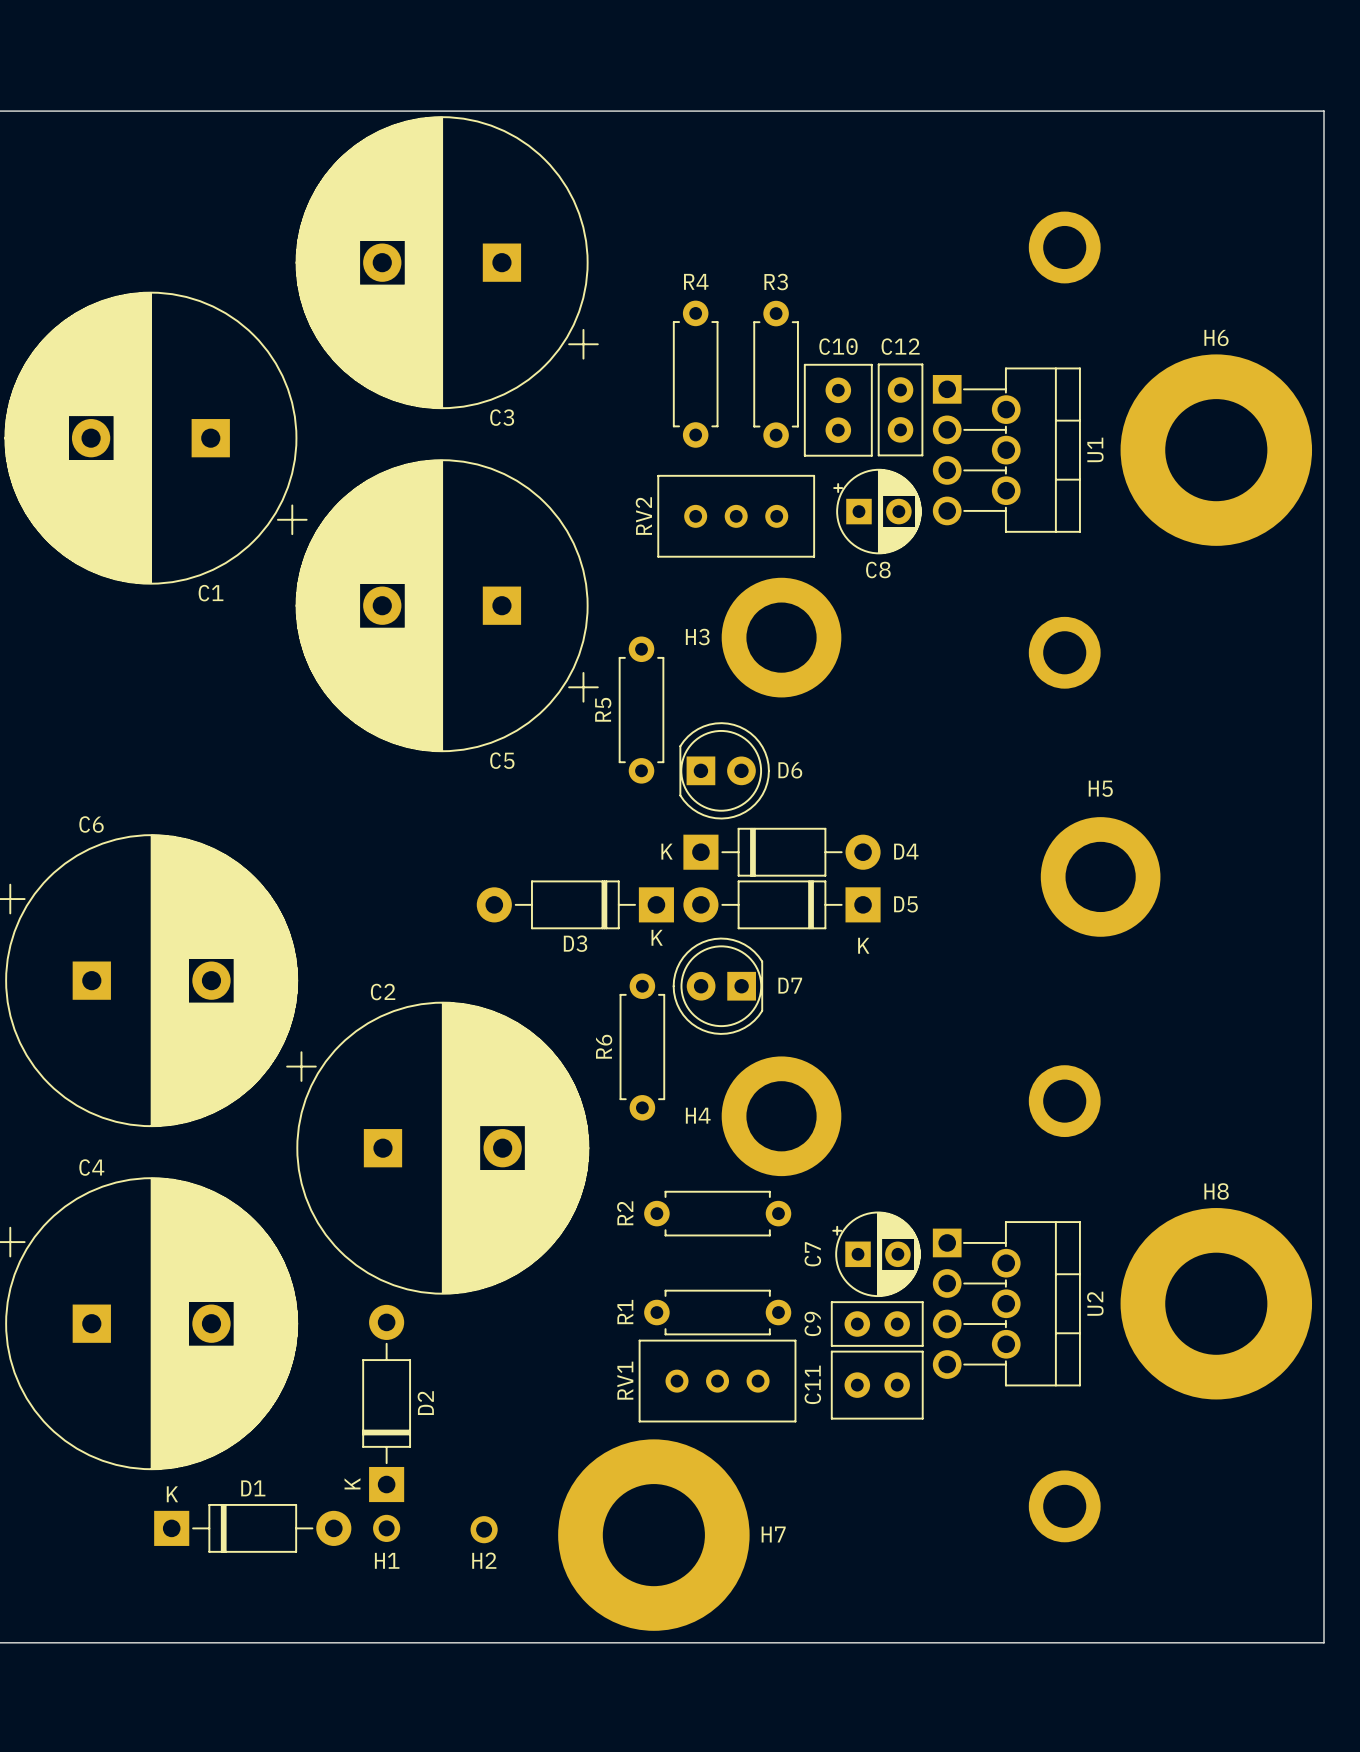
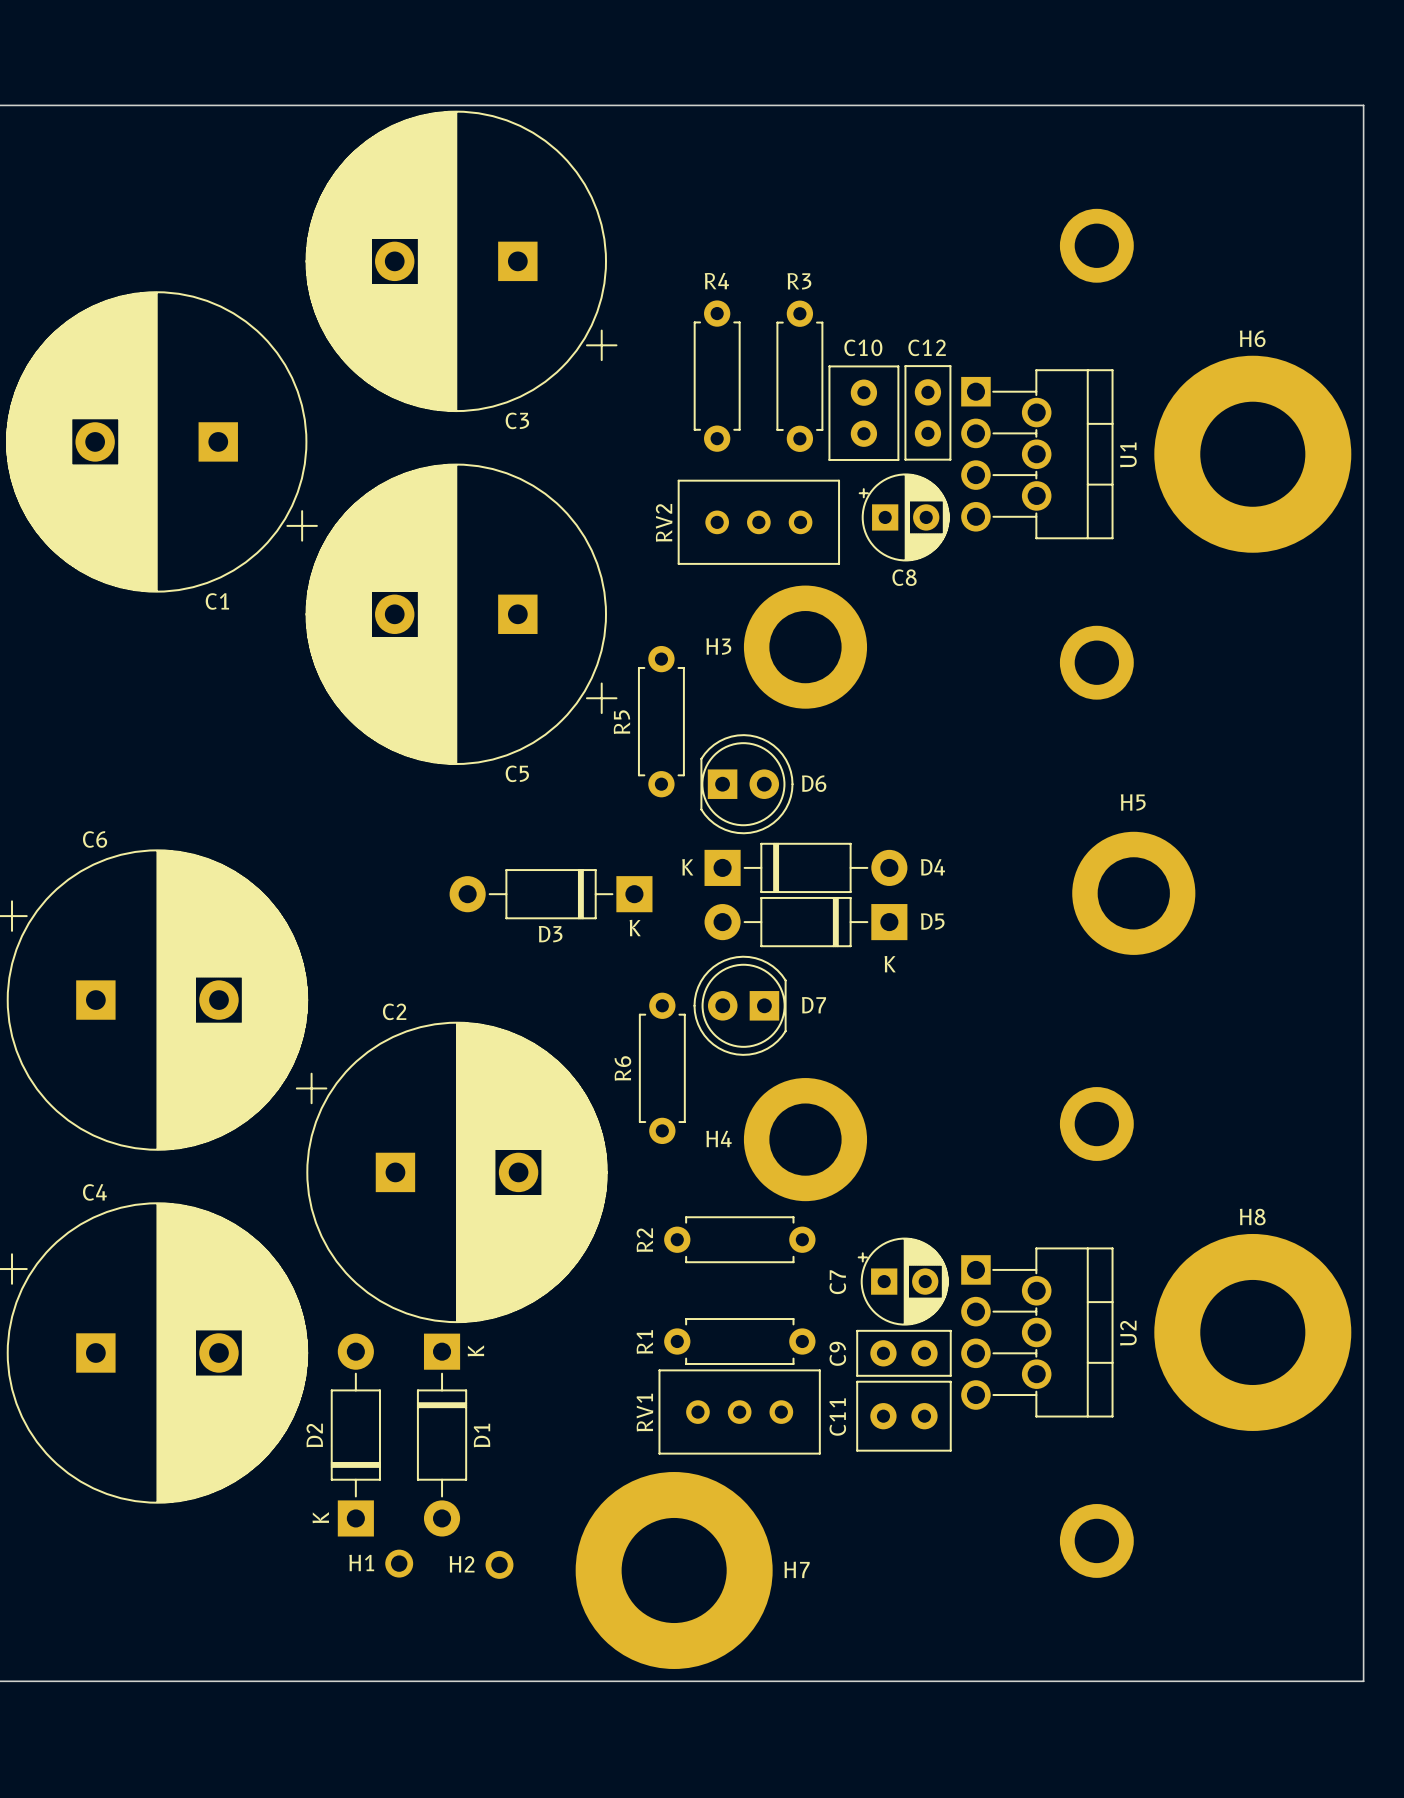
D3 position: (575, 904) -> (551, 894)
D2 position: (386, 1403) -> (355, 1435)
D2 name position: D2 (425, 1403) -> D2 (314, 1435)
D1 rotation: 0° (252, 1528) -> 90° clockwise (442, 1435)
D1 position: (252, 1528) -> (442, 1435)
H1 name position: H1 (387, 1560) -> H1 (361, 1562)
H2 name position: H2 (484, 1560) -> H2 (462, 1564)

